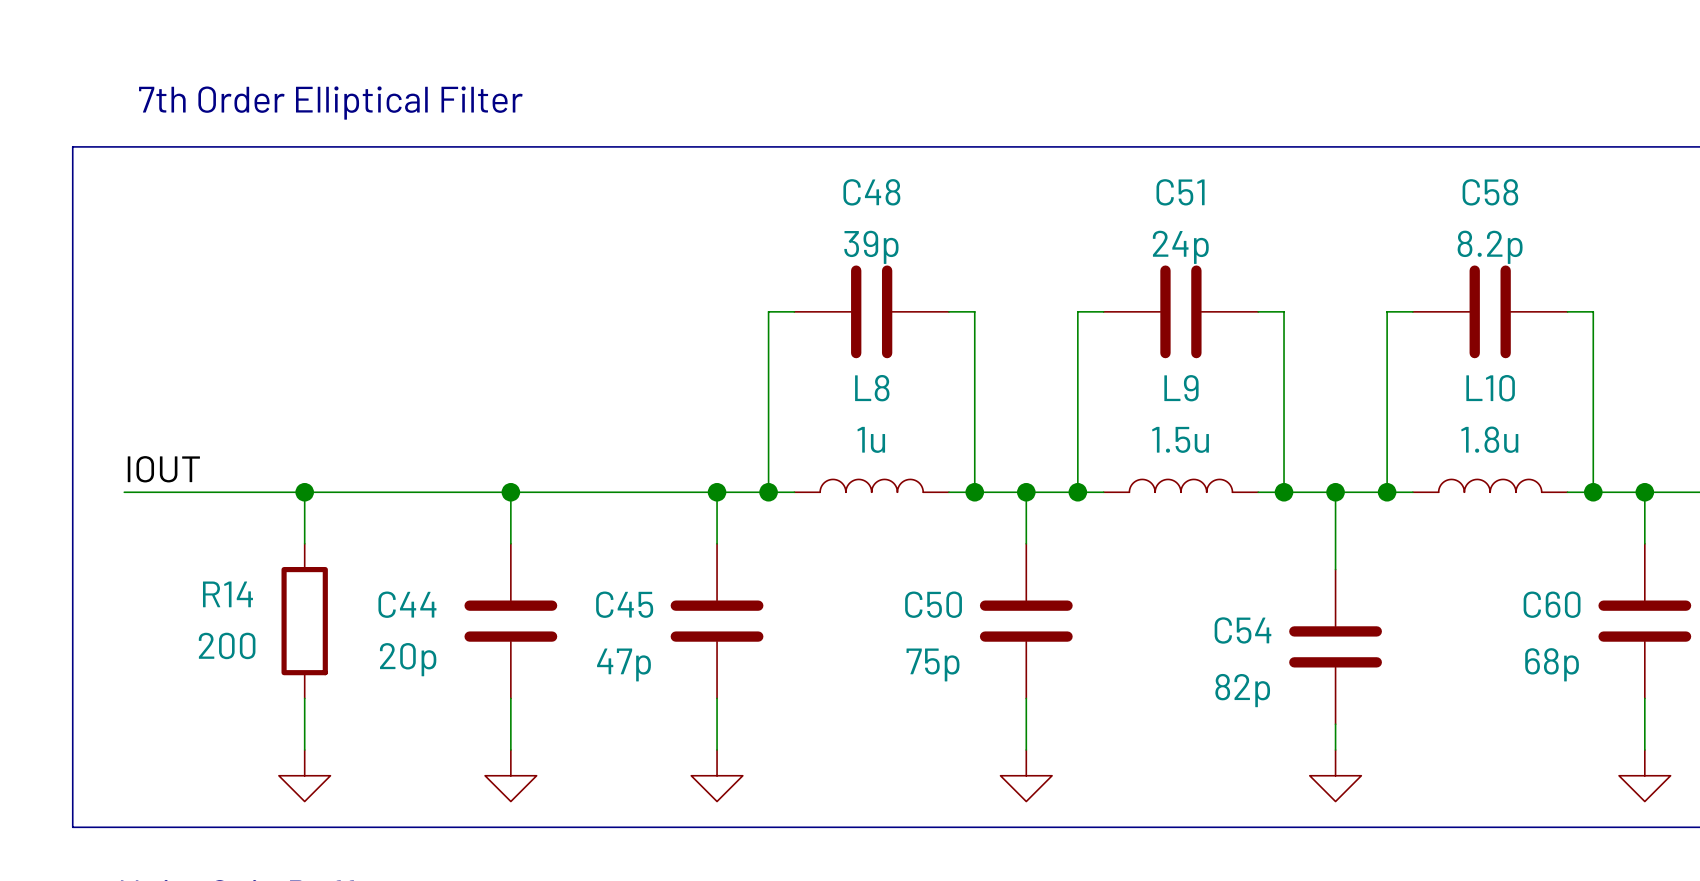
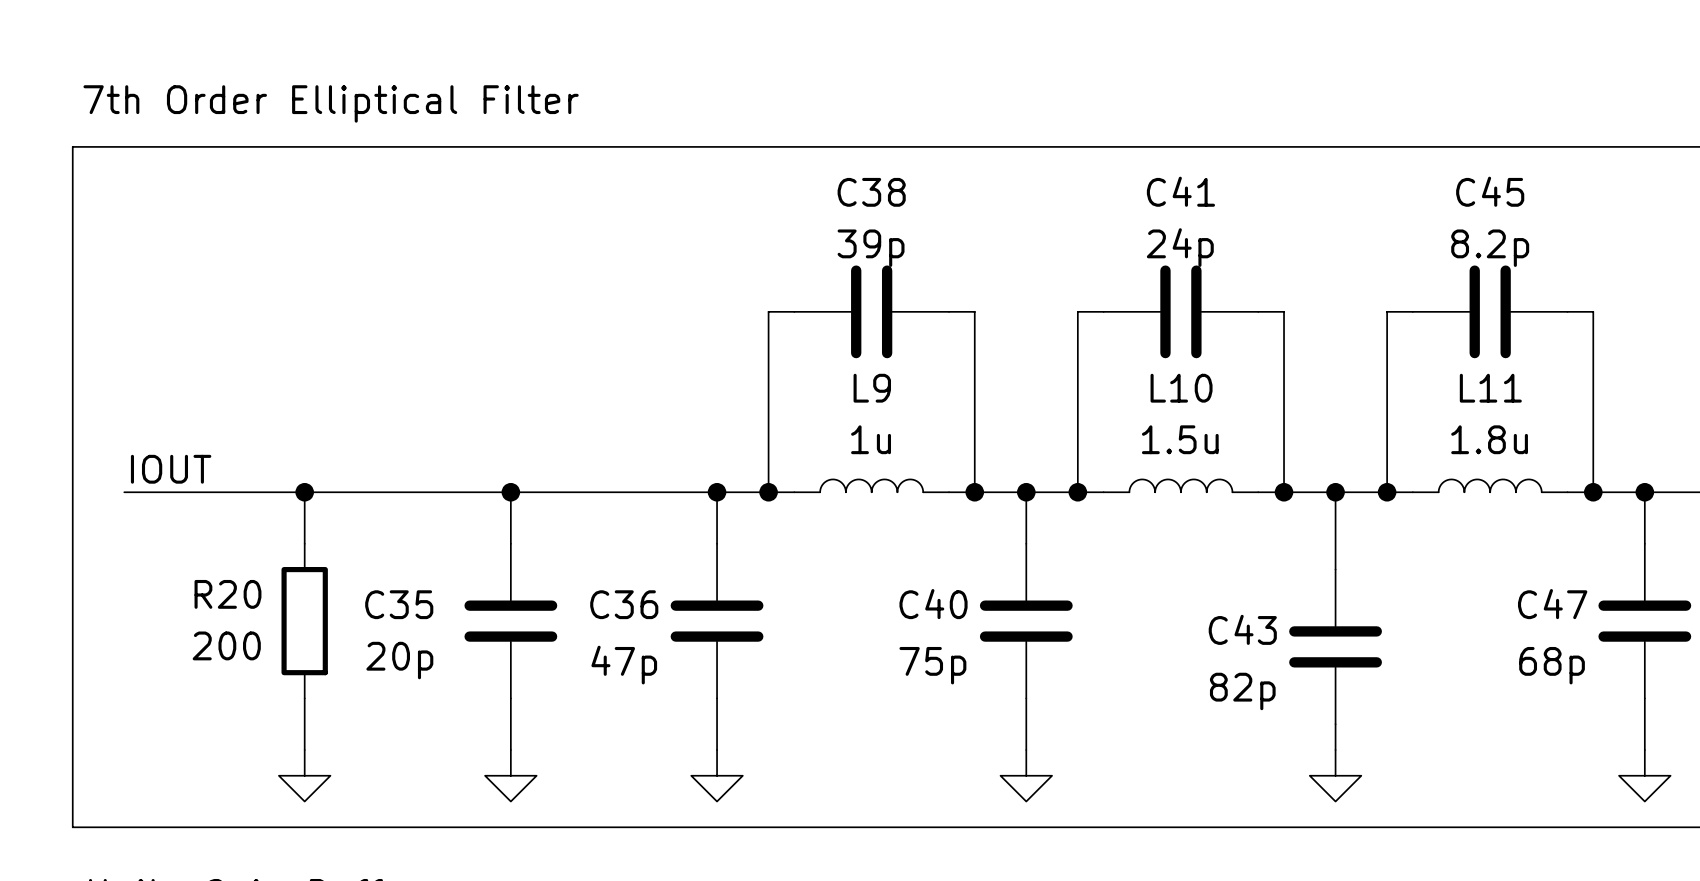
C48 name: C48 (871, 192) -> C38 (871, 192)
C51 name: C51 (1180, 192) -> C41 (1180, 191)
C58 name: C58 (1490, 192) -> C45 (1490, 191)
L8 name: L8 (872, 388) -> L9 (872, 388)
L9 name: L9 (1181, 388) -> L10 (1181, 388)
L10 name: L10 (1490, 388) -> L11 (1490, 388)
R14 name: R14 (227, 594) -> R20 (227, 594)
C44 name: C44 (407, 604) -> C35 (399, 604)
C45 name: C45 (624, 604) -> C36 (624, 604)
C50 name: C50 (933, 604) -> C40 (933, 604)
C60 name: C60 (1552, 604) -> C47 (1552, 604)
C54 name: C54 (1242, 630) -> C43 (1242, 629)

